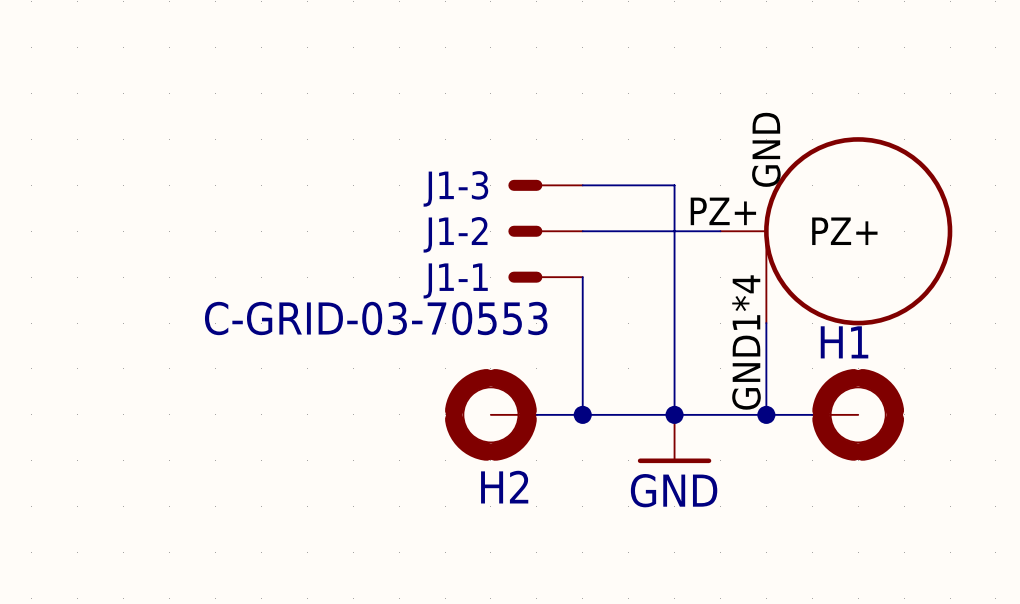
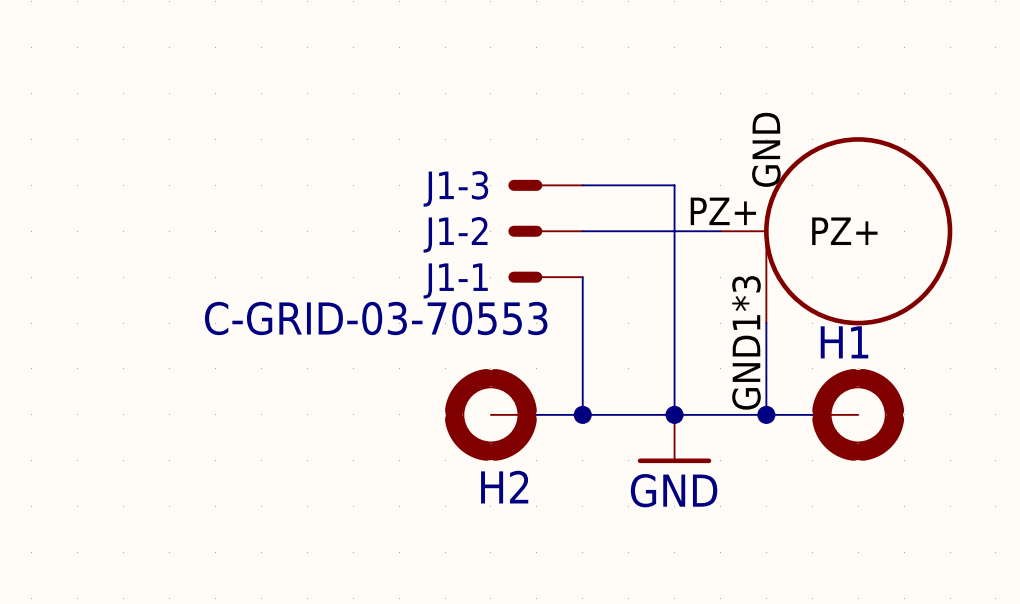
part pin number: GND1*4 (746, 342) -> GND1*3 (746, 342)

